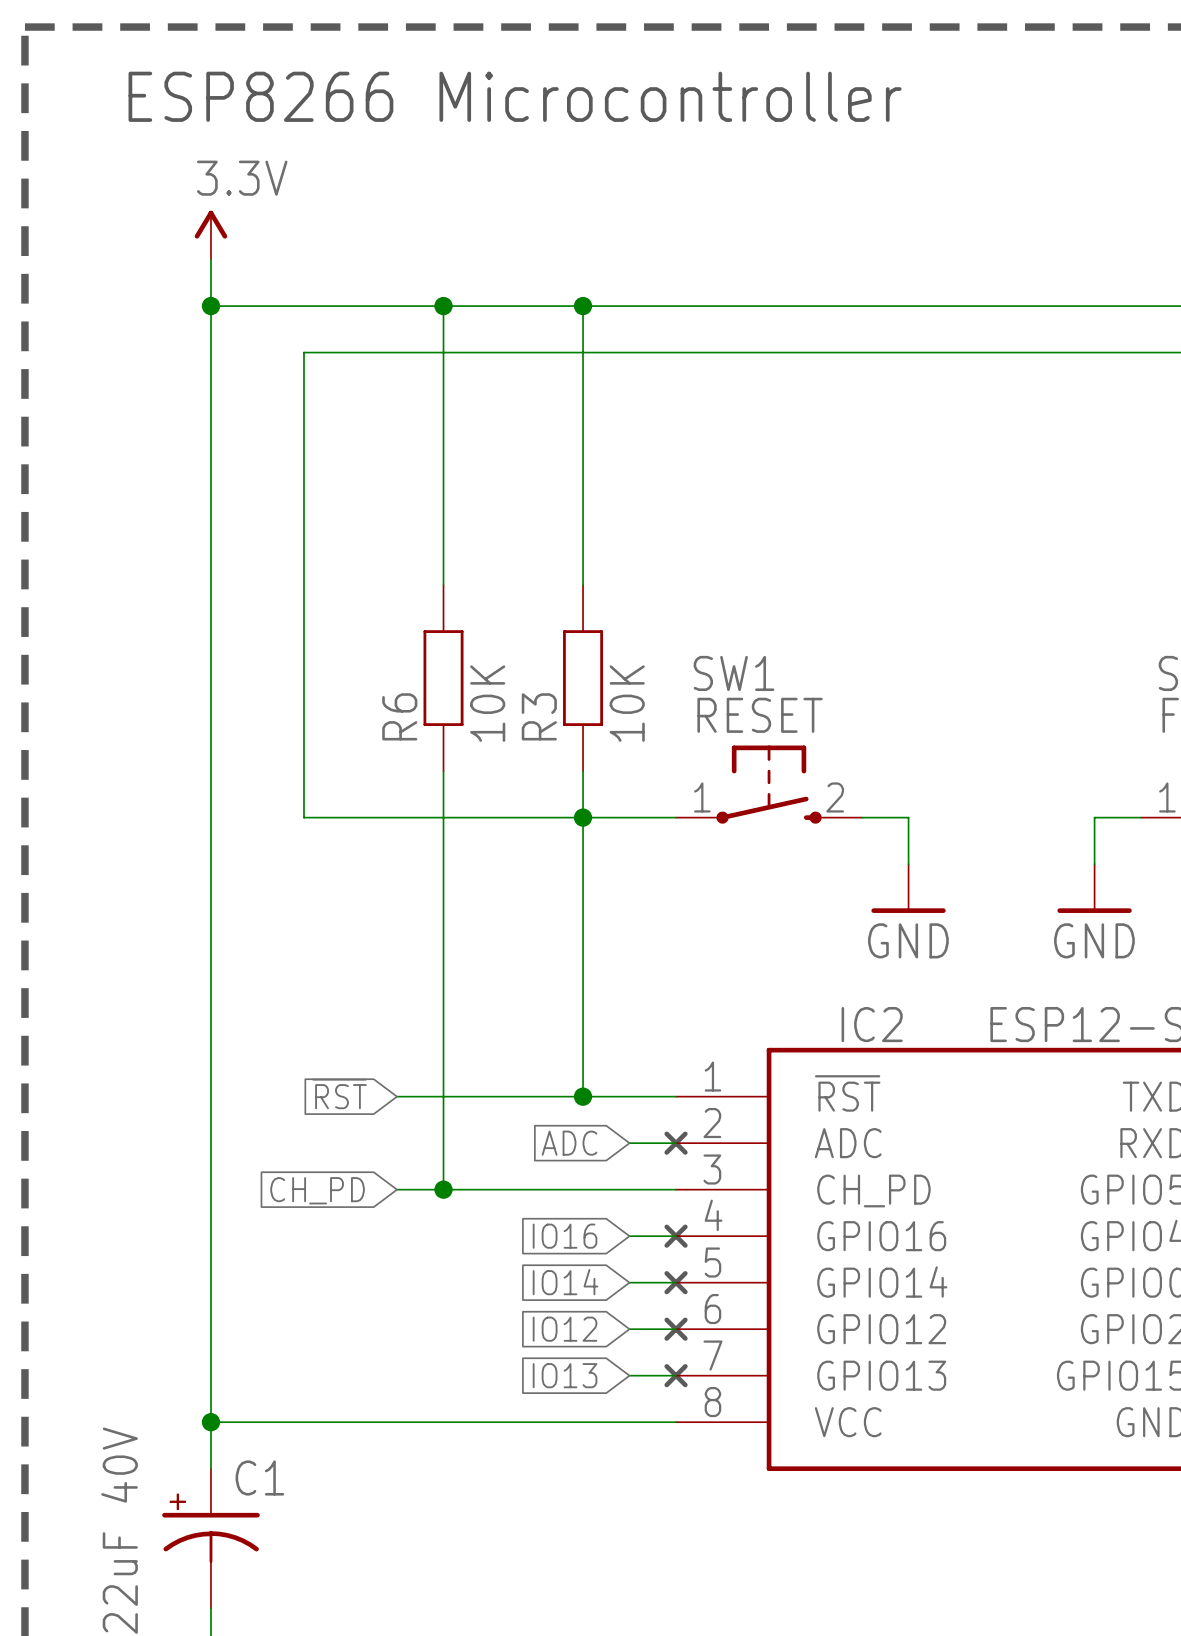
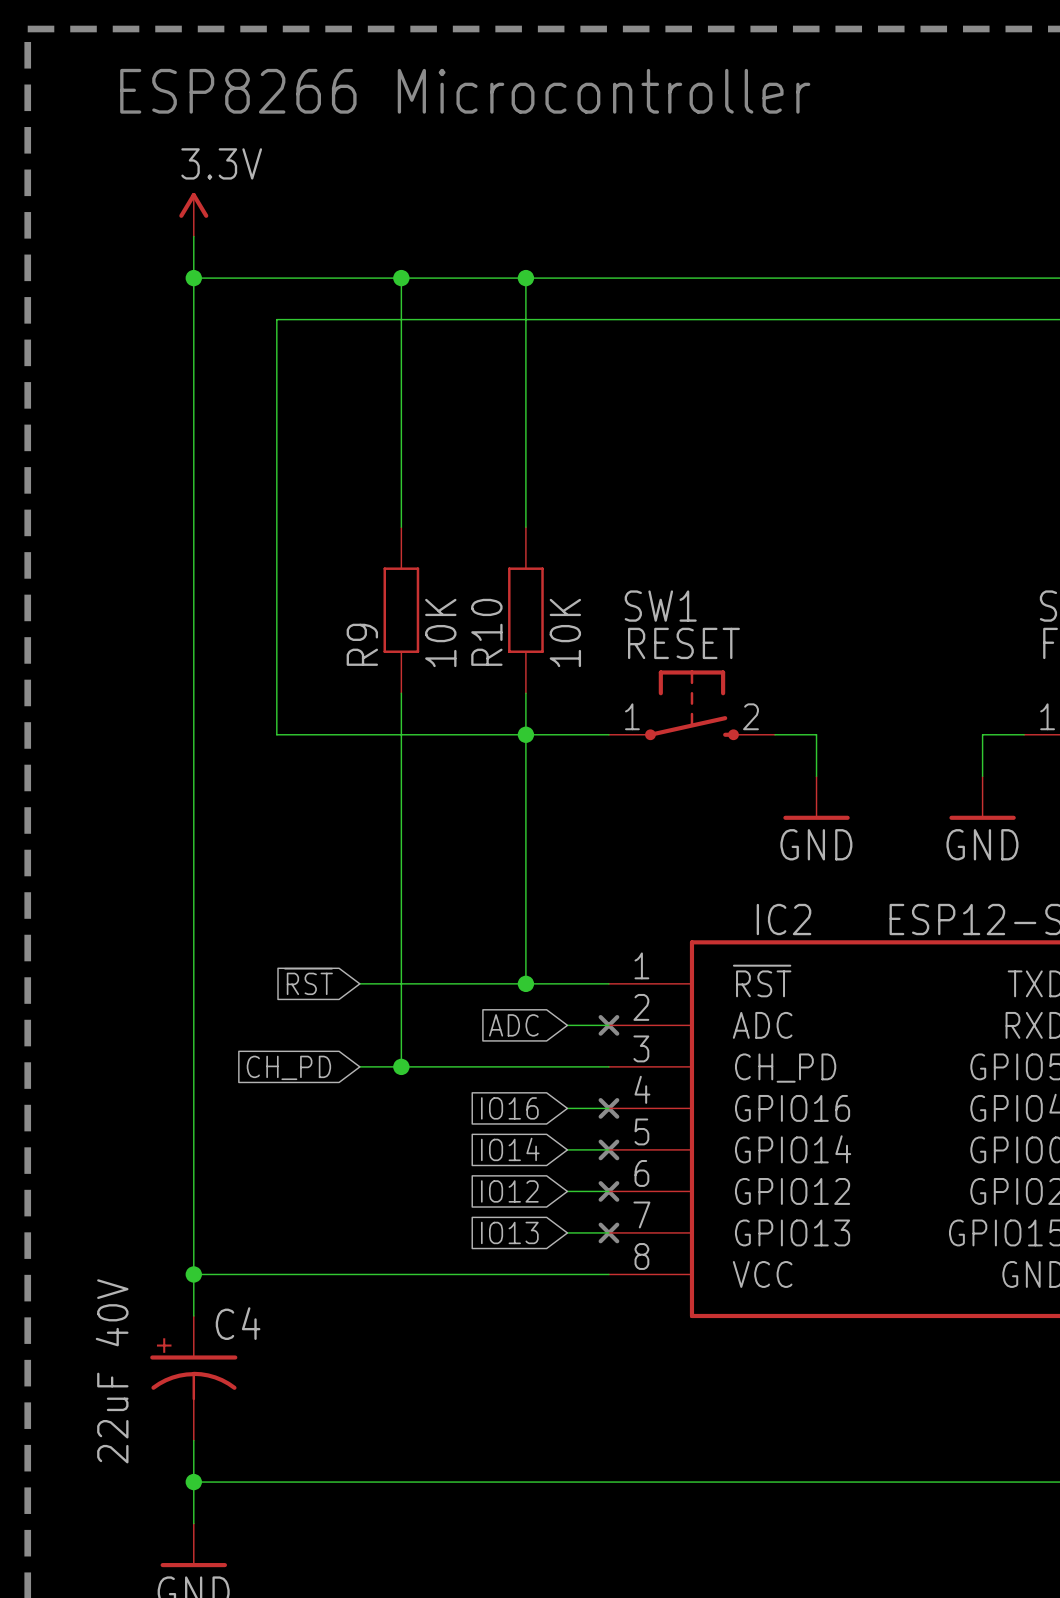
R6 name: R6 (399, 716) -> R9 (362, 644)
R3 name: R3 (539, 716) -> R10 (486, 632)
C1 name: C1 (259, 1477) -> C4 (238, 1323)

